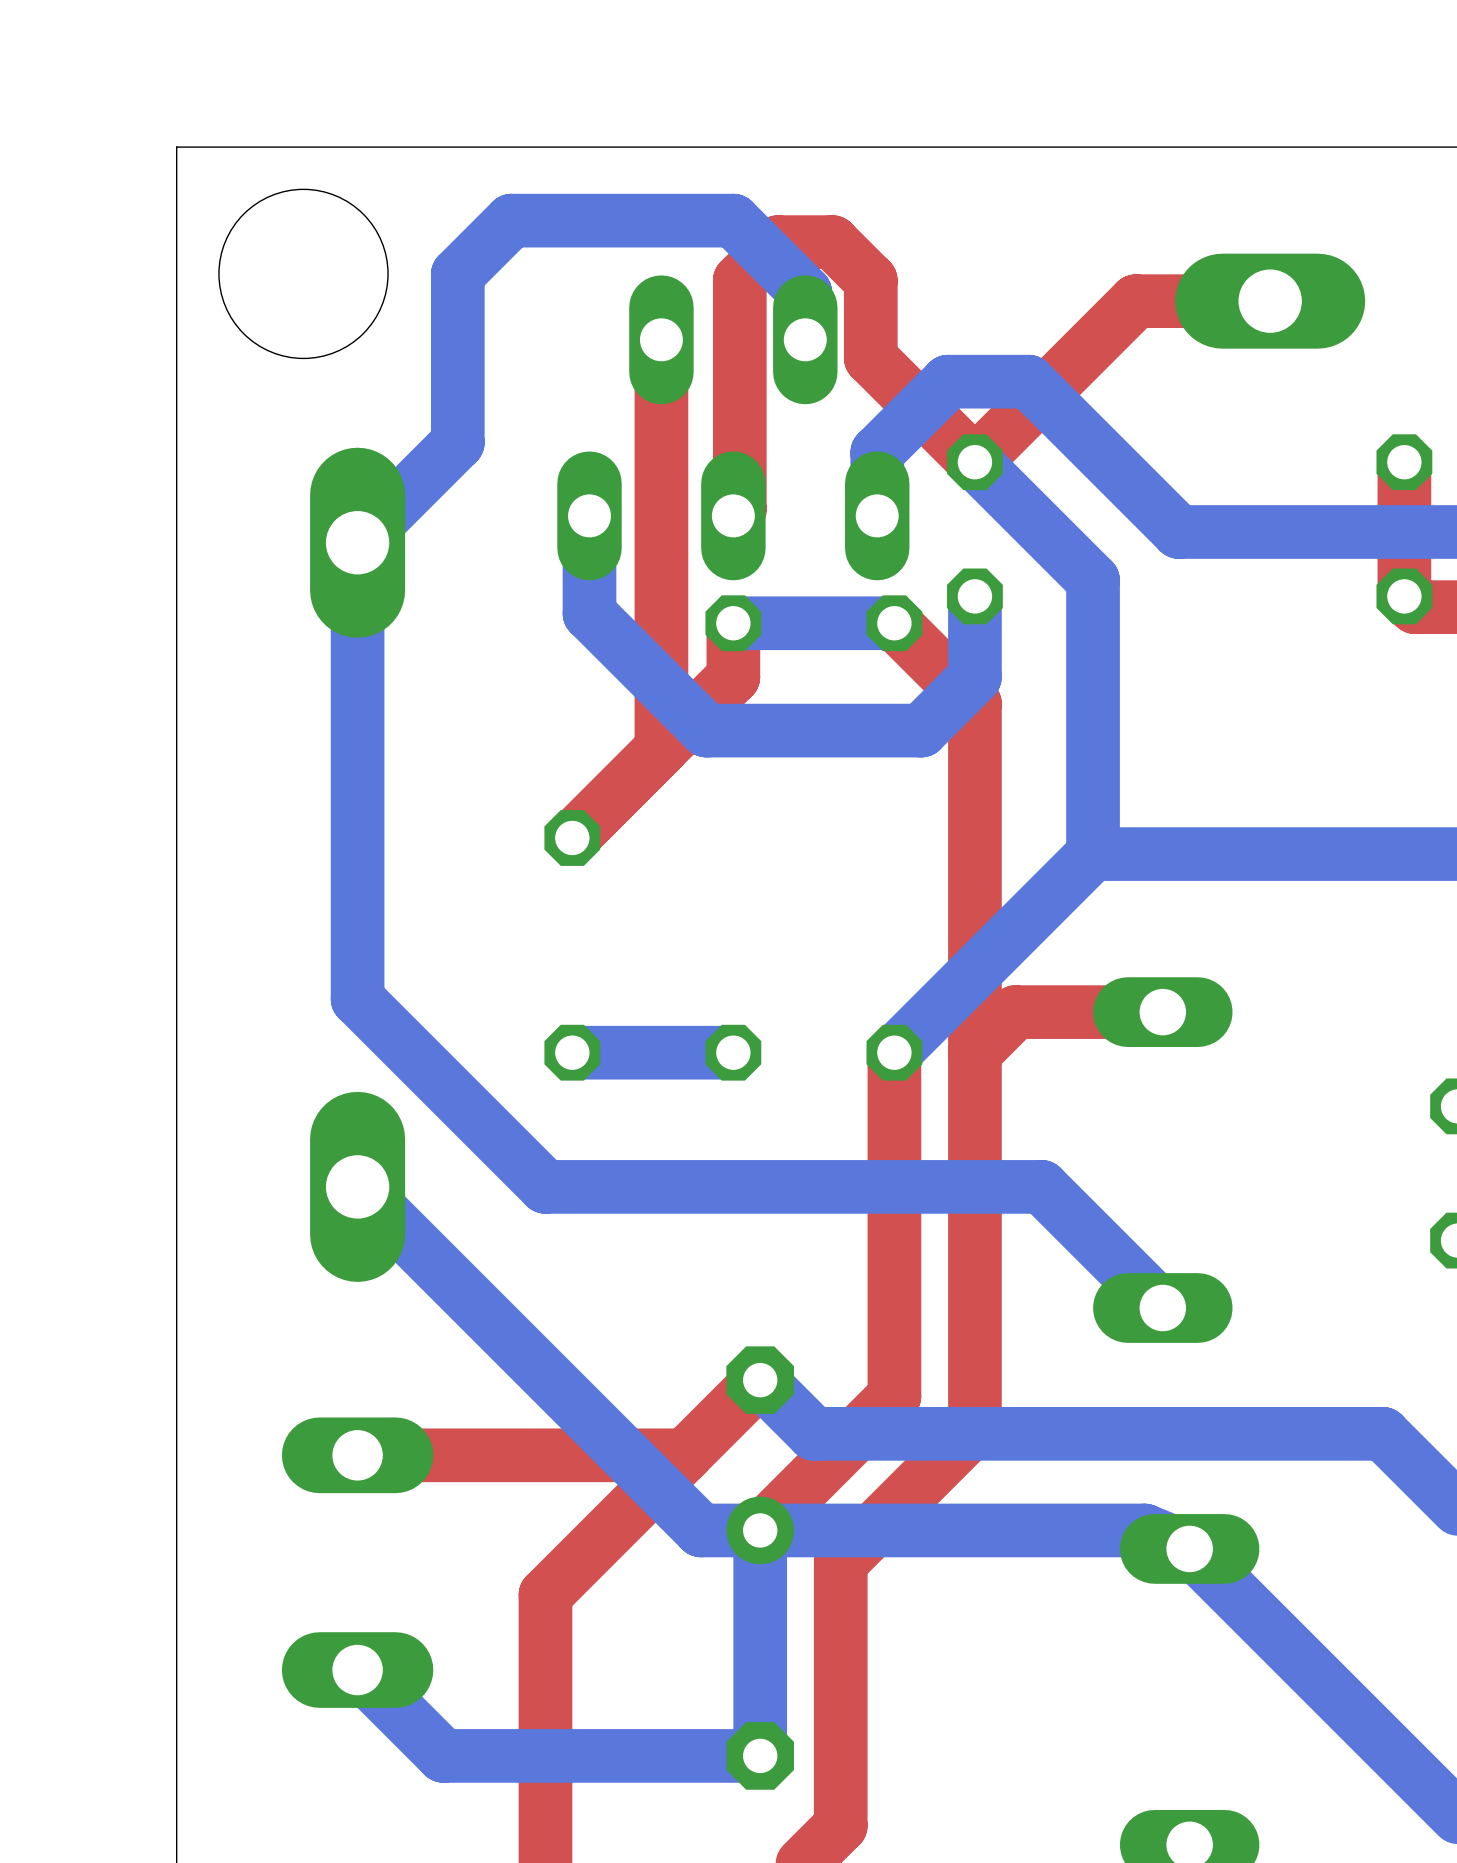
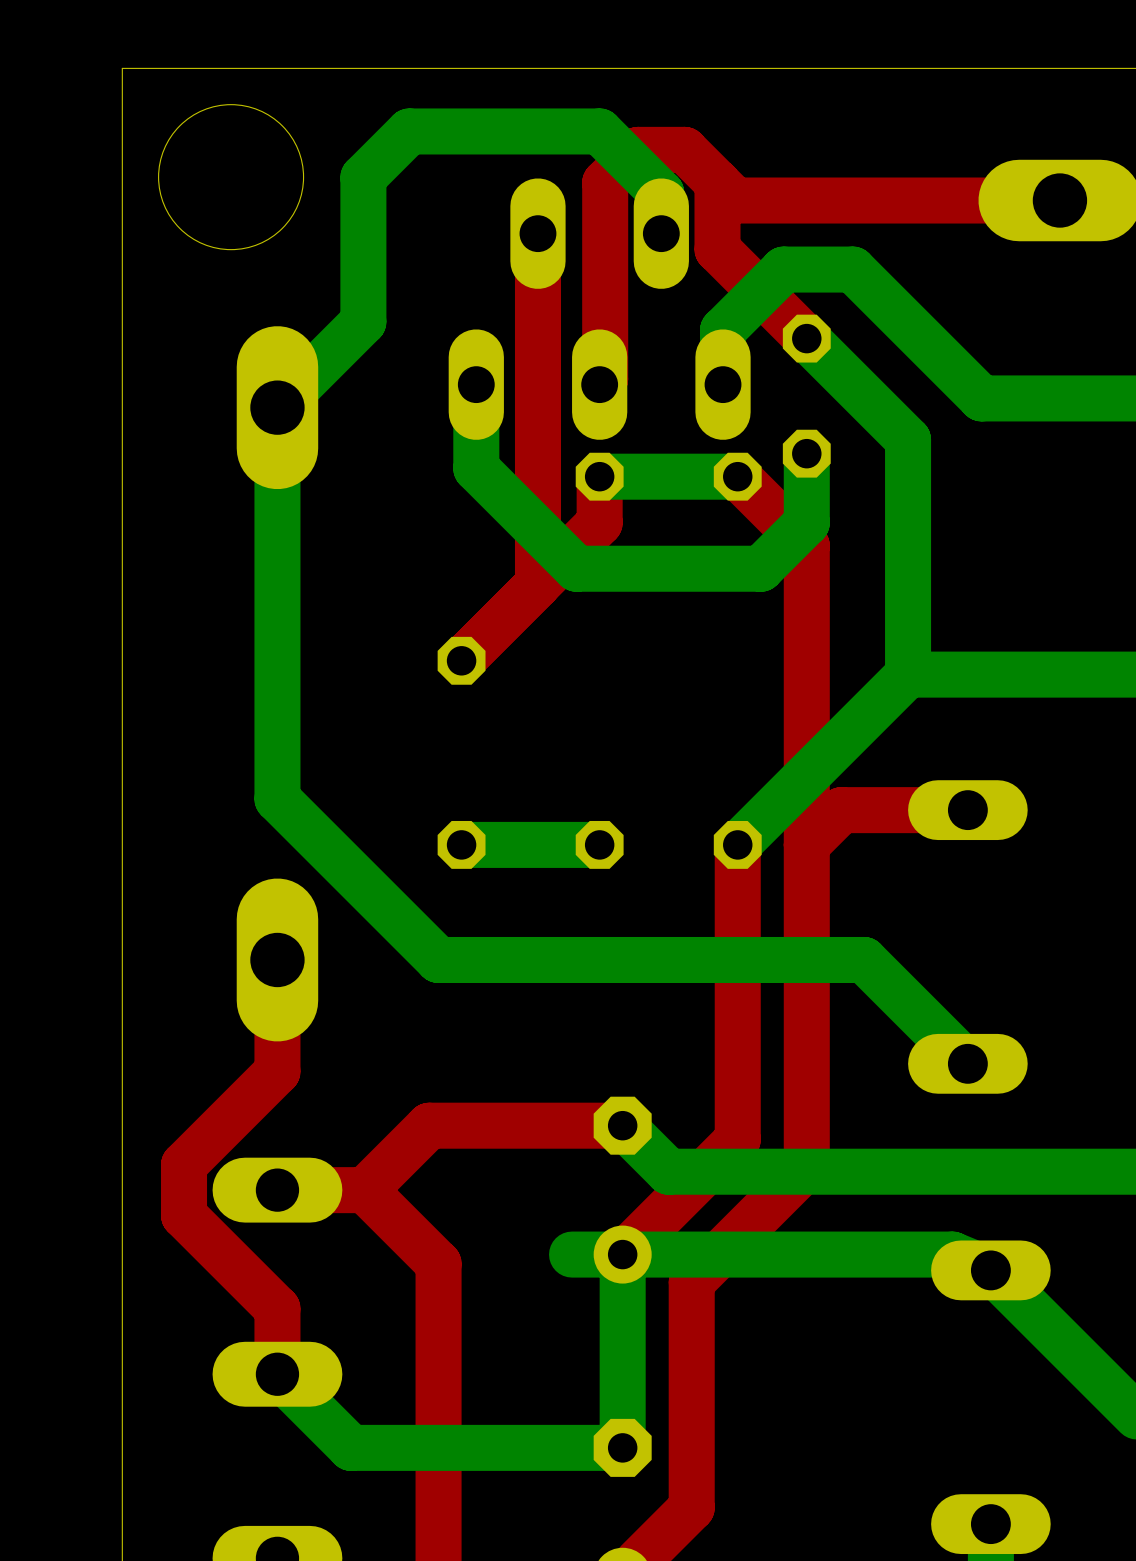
top track: (1135, 301) (974, 462) -> (944, 200) (735, 200) (717, 182)
top track: none -> (277, 959) (277, 1071) (184, 1164) (184, 1215) (277, 1308) (277, 1374)
bottom track: (357, 1186) (701, 1530) -> none
top track: (760, 1380) (545, 1594) -> (622, 1125) (429, 1125) (364, 1190) (438, 1263) (438, 1309)
top track: (685, 1455) (459, 1455) -> none

